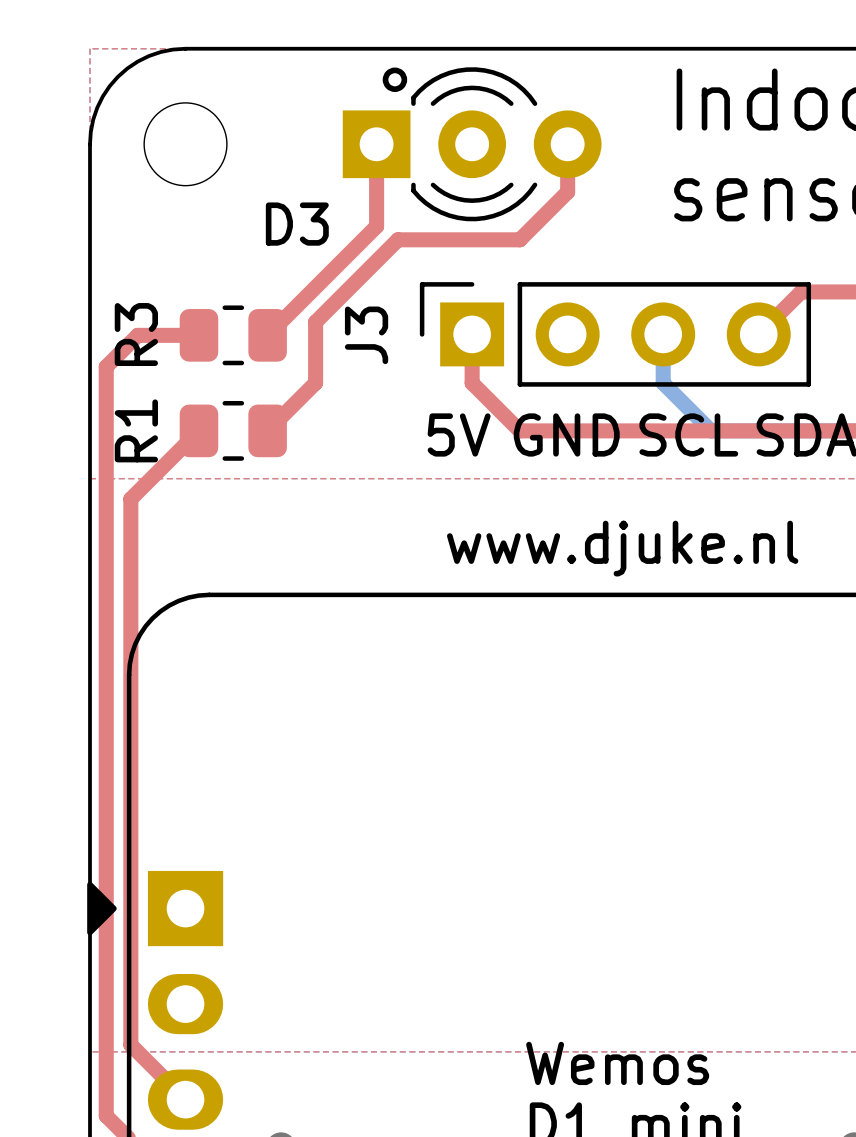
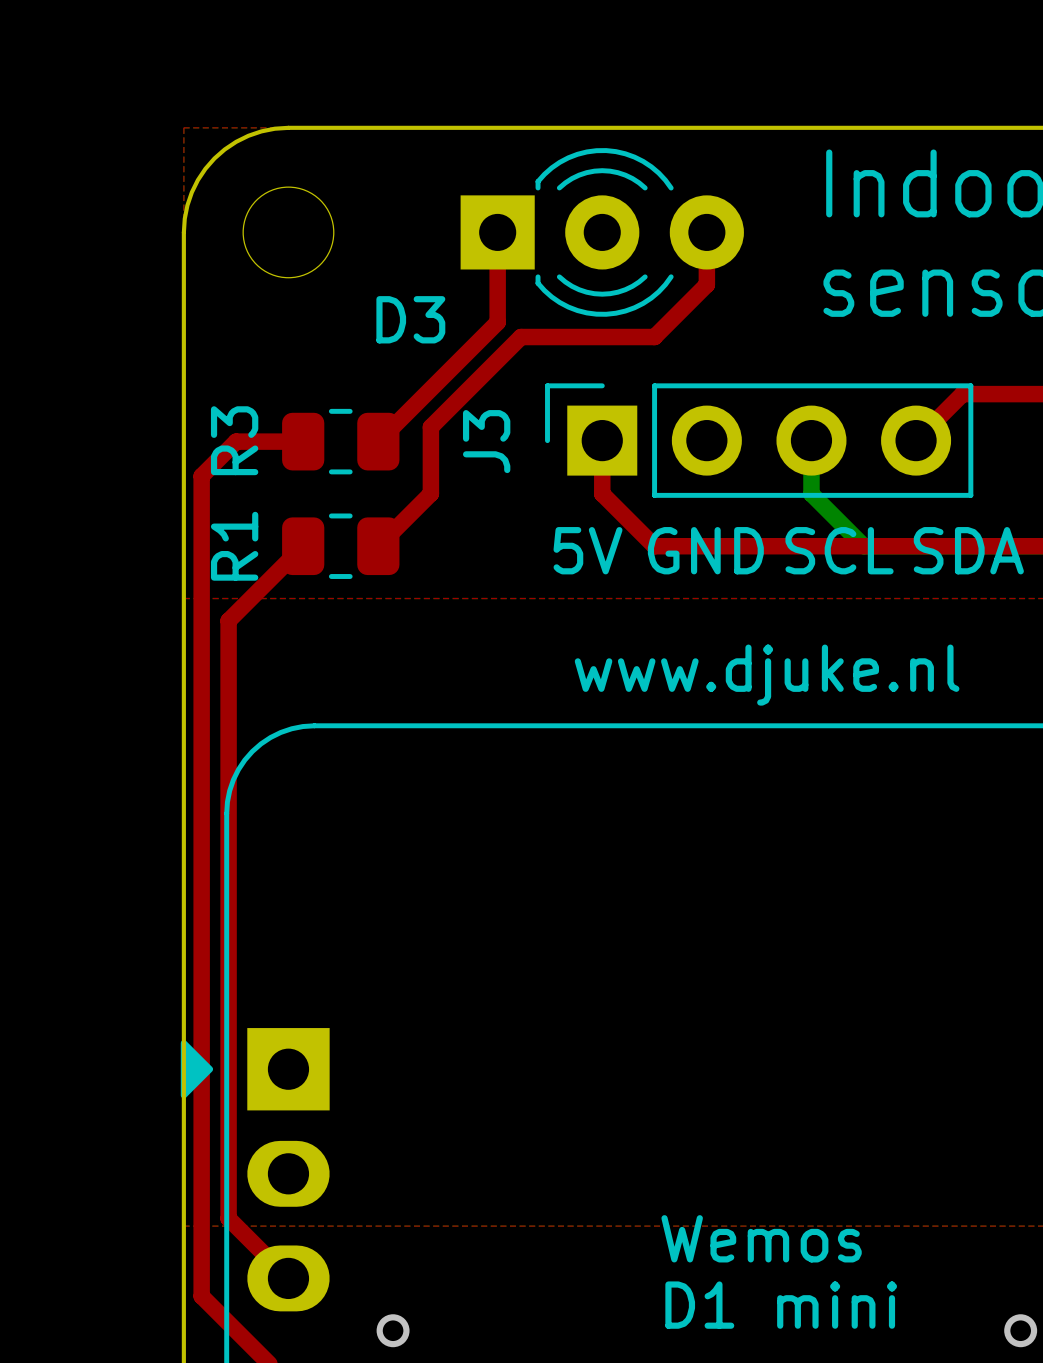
drawing: [382, 67, 408, 92] -> none

